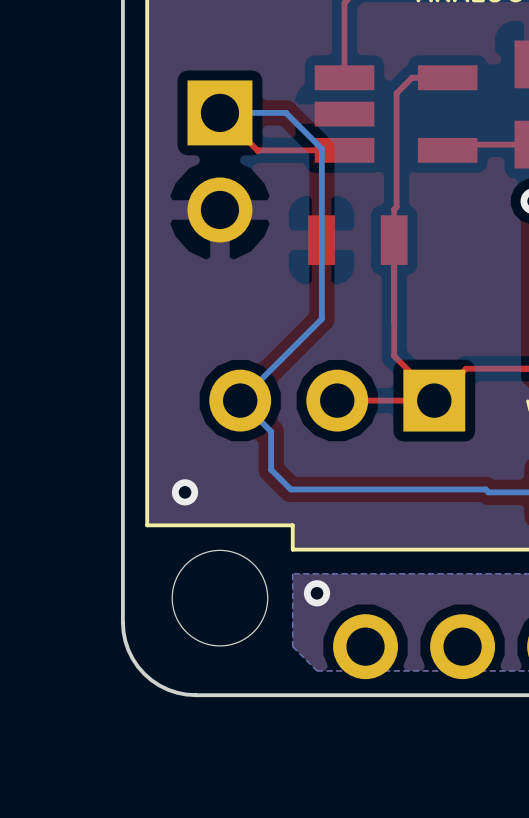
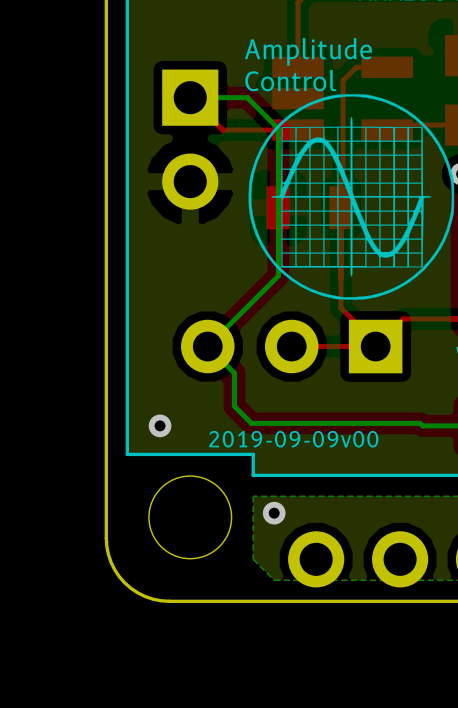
text: none -> Amplitude (308, 51)
text: none -> Control (290, 80)
drawing: none -> [248, 94, 455, 300]
text: none -> 2019-09-09v00 (293, 439)

